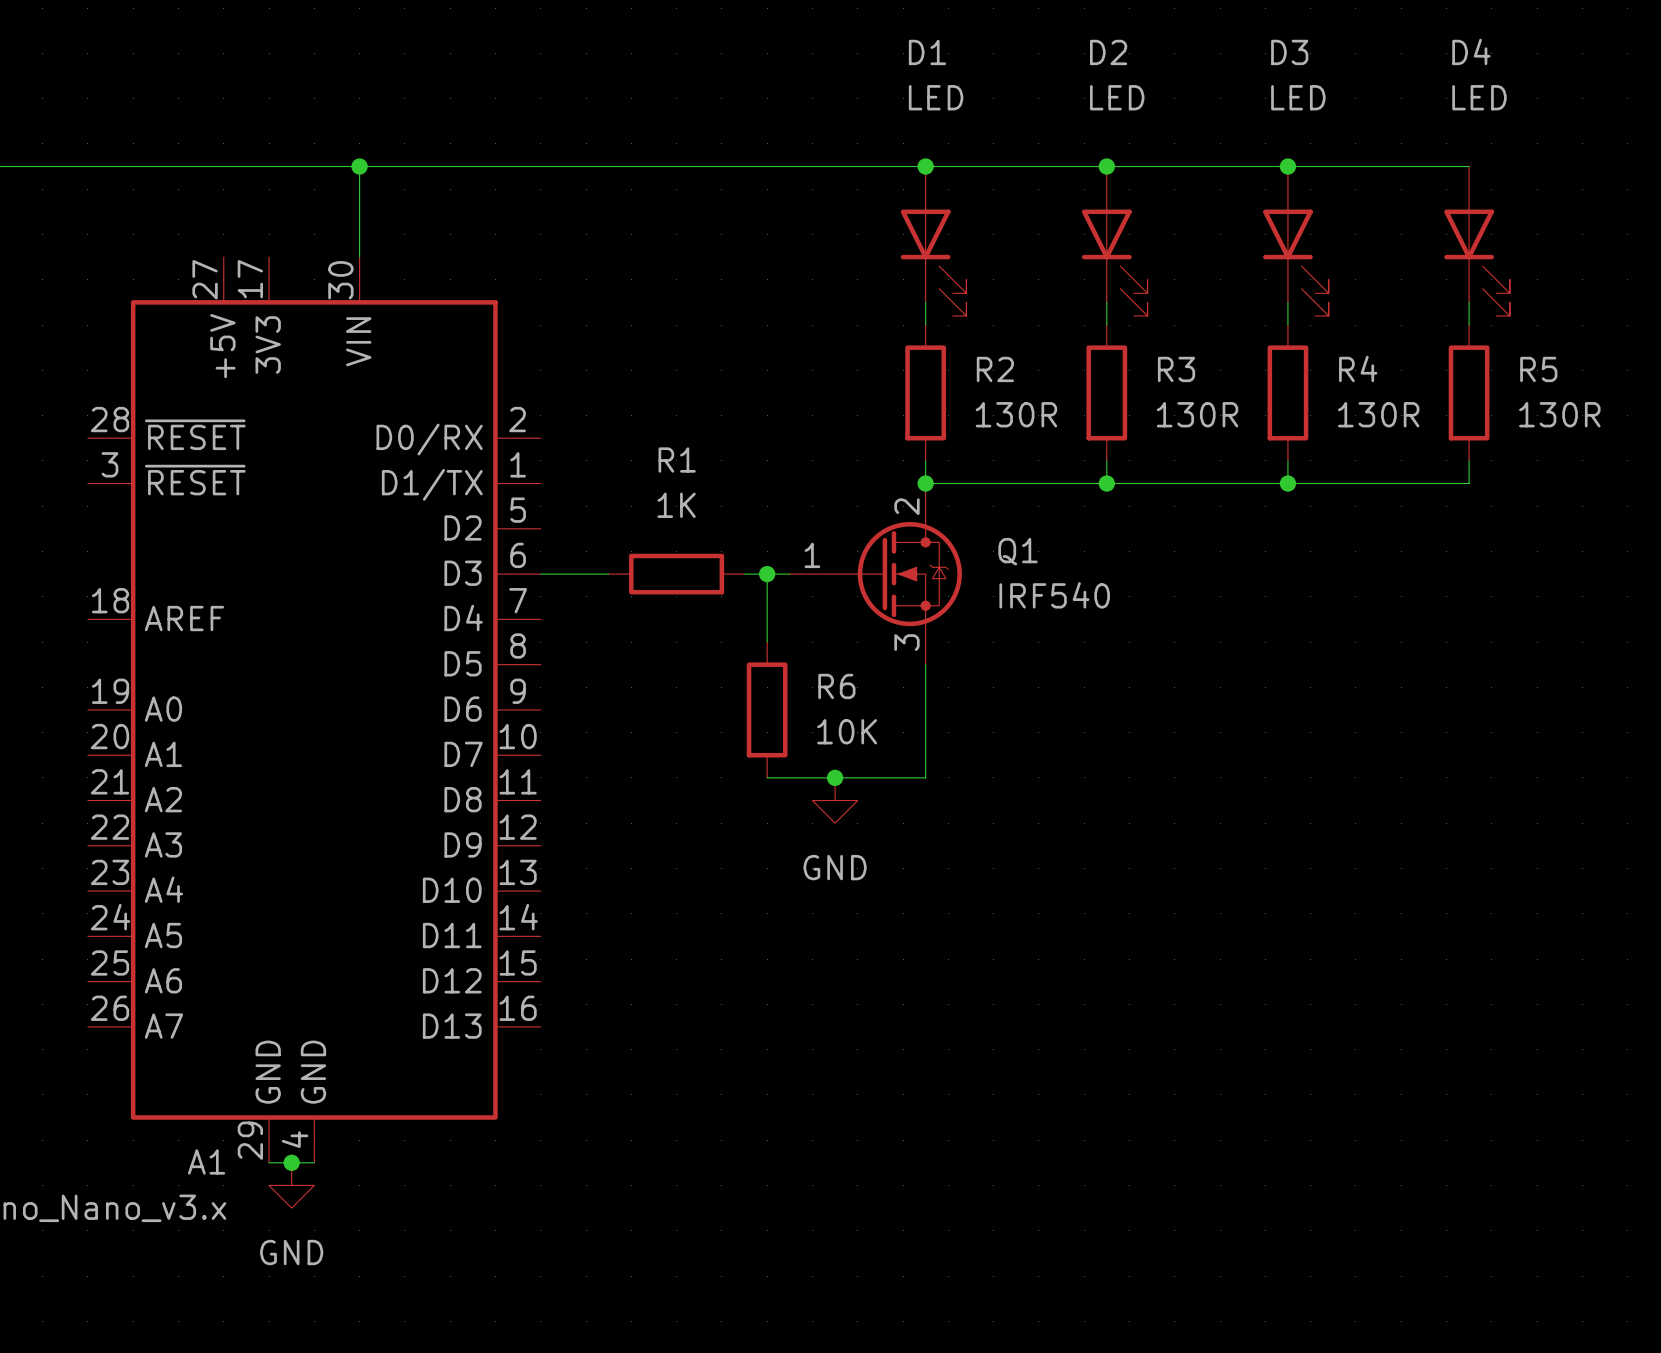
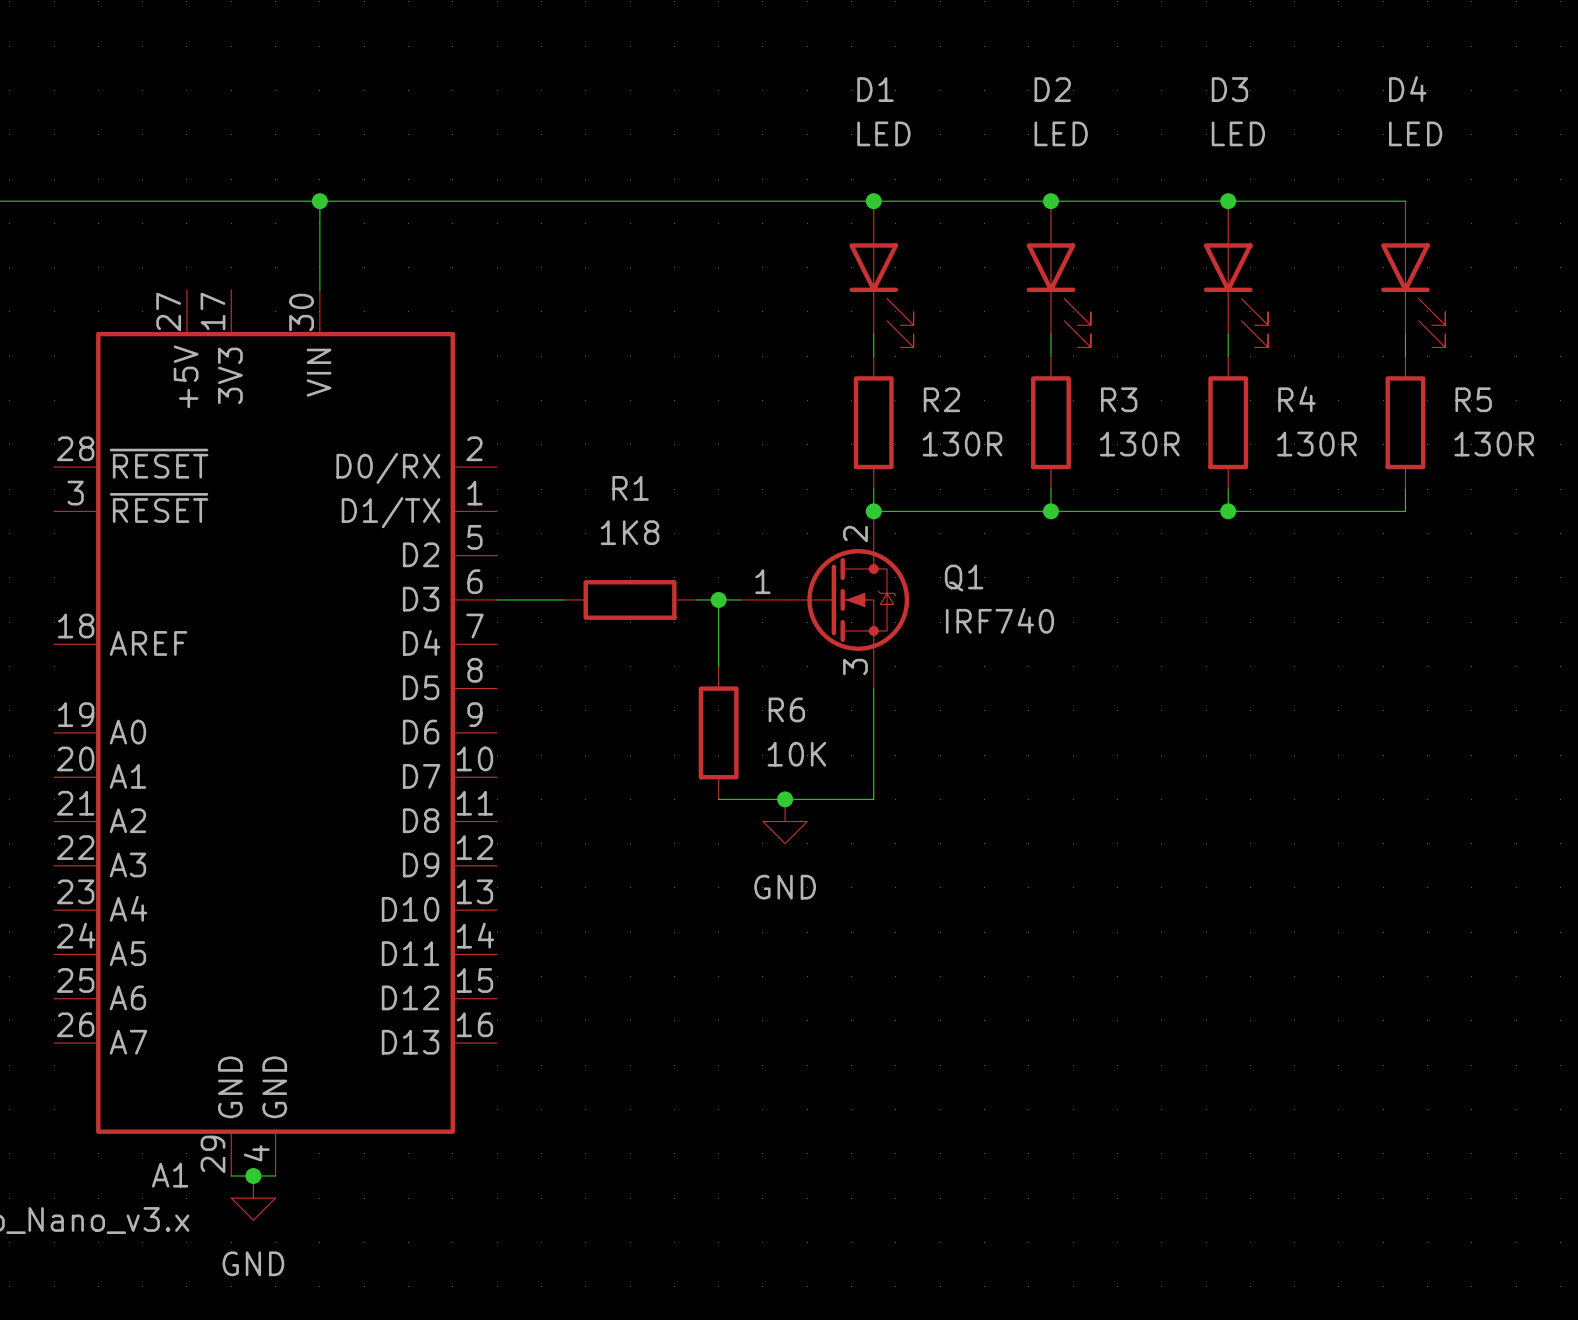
R1 value: 1K (676, 505) -> 1K8 (630, 532)
Q1 value: IRF540 (1054, 595) -> IRF740 (999, 620)

